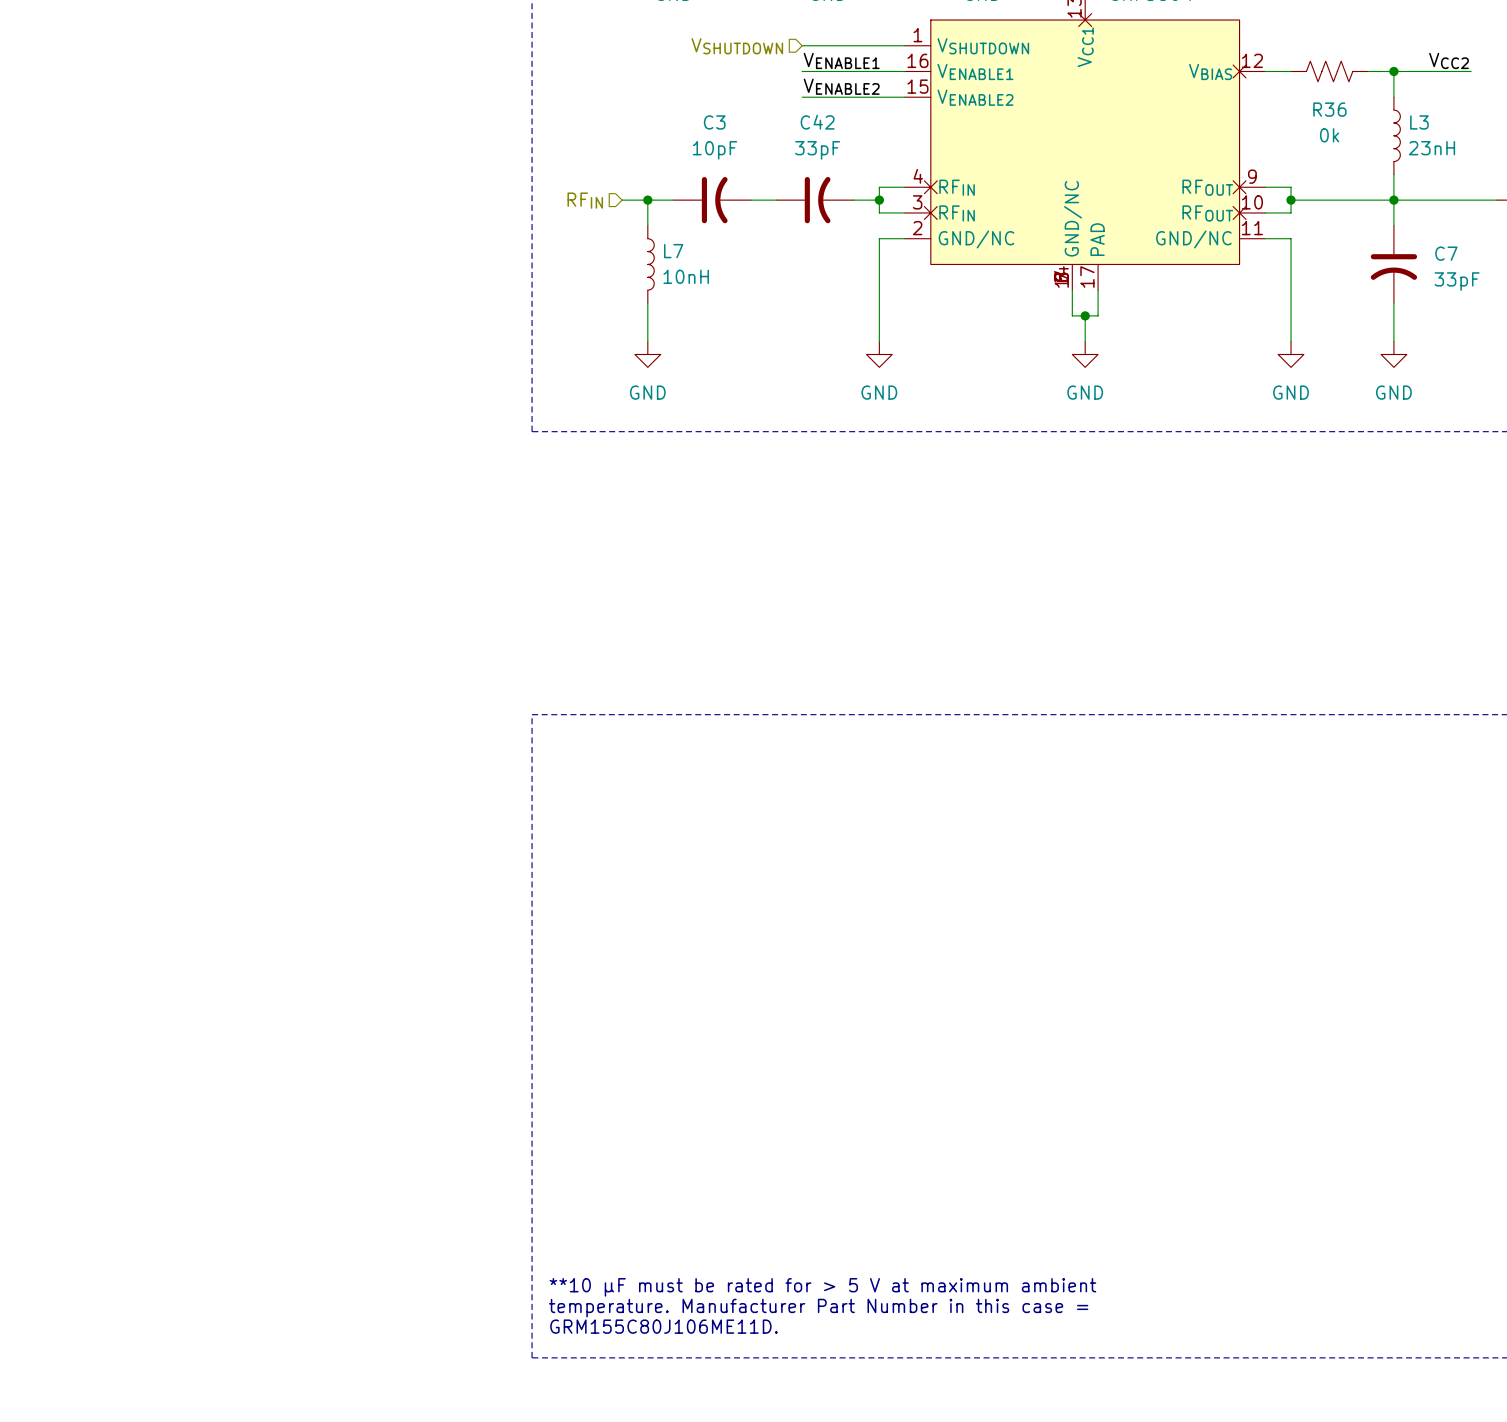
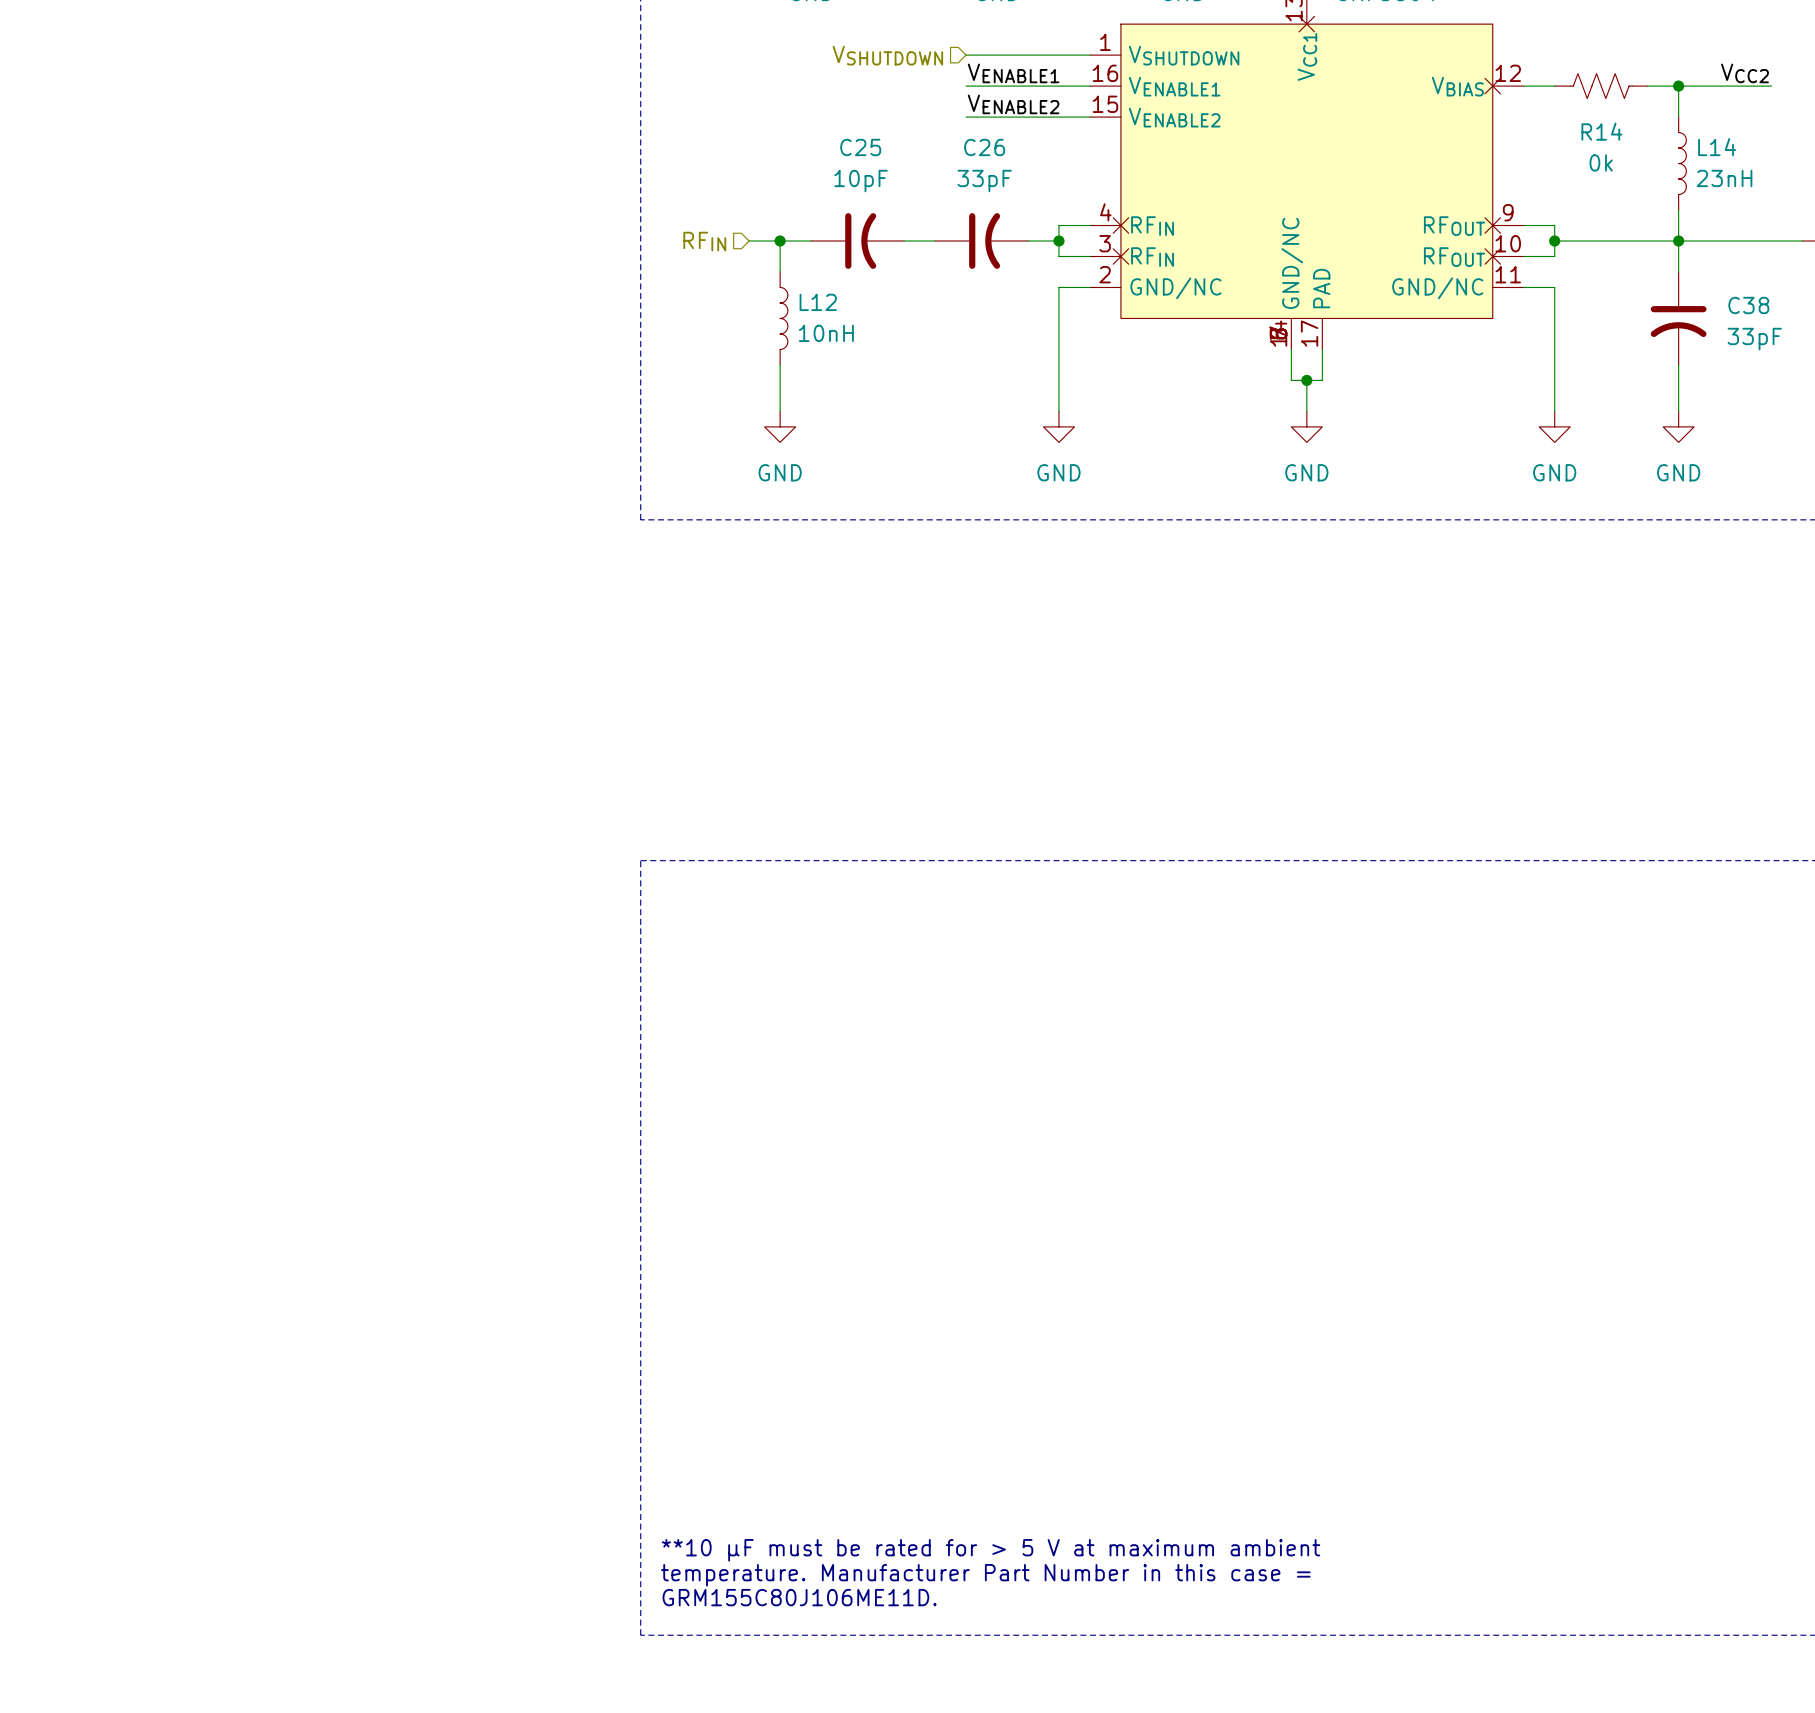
R36 name: R36 (1329, 109) -> R14 (1601, 131)
C3 name: C3 (714, 122) -> C25 (860, 147)
C42 name: C42 (817, 122) -> C26 (984, 147)
L3 name: L3 (1419, 122) -> L14 (1717, 147)
L7 name: L7 (673, 251) -> L12 (818, 302)
C7 name: C7 (1446, 253) -> C38 (1748, 305)

